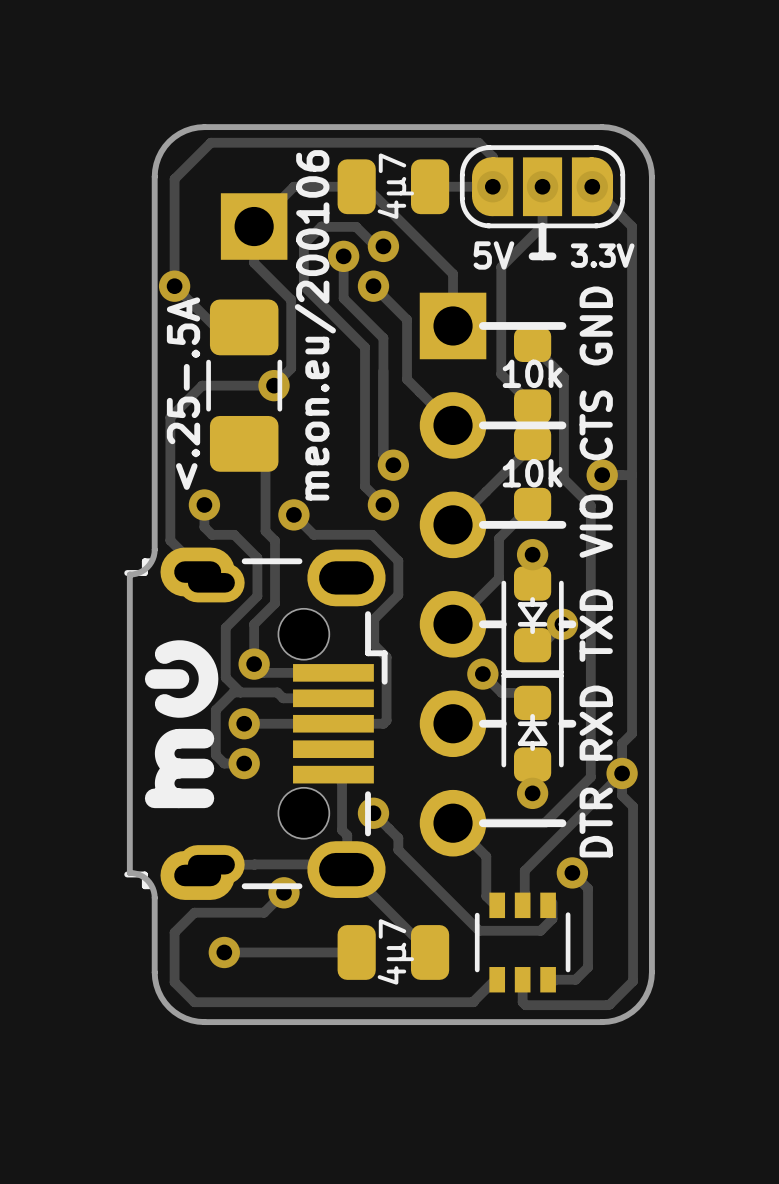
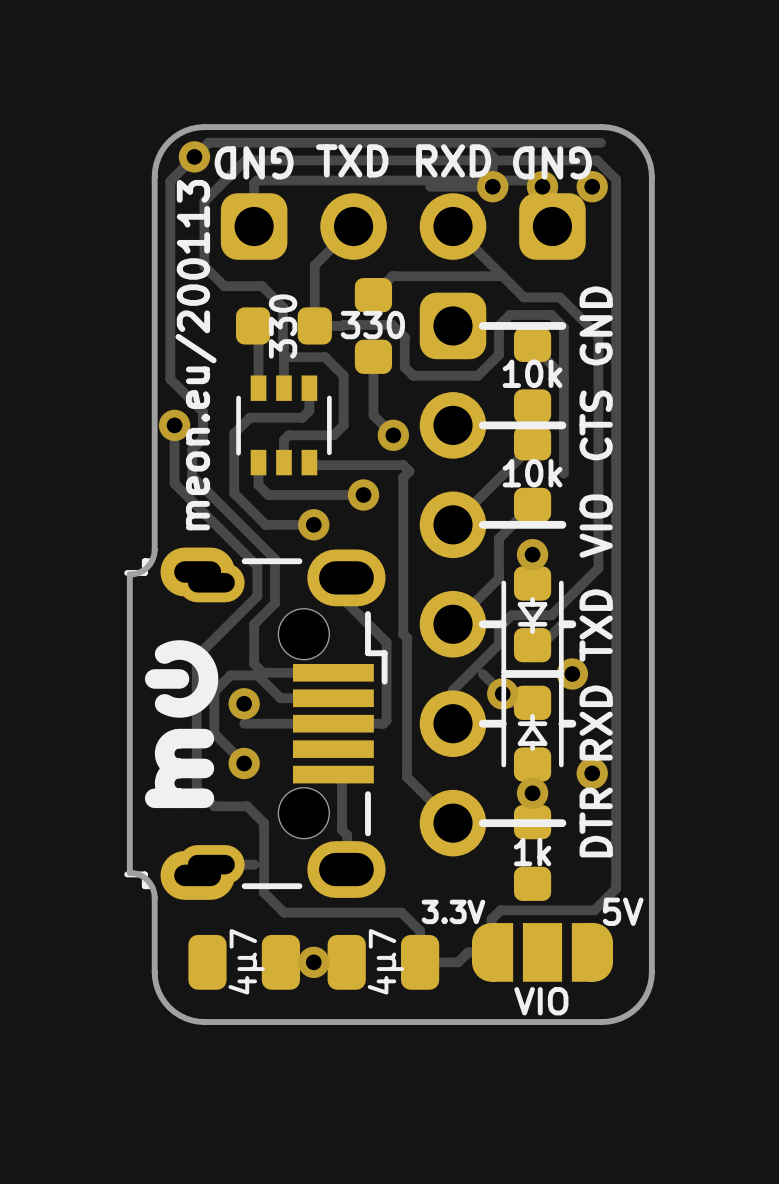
track: (478, 142) (210, 142) (174, 179) (174, 286) (215, 327) (244, 327) -> none
via: none -> (194, 156)
text: none -> TXD (352, 160)
text: none -> RXD (453, 160)
text: none -> GND (254, 162)
text: none -> GND (552, 162)
part position: (393, 186) -> (244, 962)
track: (542, 186) (542, 225) (501, 267) (501, 374) (532, 406) -> none
part: (542, 186) -> none
track: (592, 186) (632, 226) (632, 733) (622, 743) (622, 795) (633, 806) (633, 981) (609, 1004) (525, 1005) (522, 1002) (522, 979) -> none
track: none -> (254, 226) (254, 183) (257, 180) (549, 180) (552, 183) (552, 226)
part: (254, 226) -> none
track: (321, 226) (303, 244) (303, 286) (364, 347) (364, 486) (383, 504) -> none
track: (321, 226) (356, 226) (375, 246) (383, 246) -> none
part: none -> (403, 226)
track: none -> (453, 226) (523, 297) (559, 297) (598, 335) (598, 568) (551, 615) (511, 615) (499, 627) (499, 644) (453, 690) (453, 723)
line: (542, 226) (542, 256) -> none
track: none -> (373, 246) (353, 226) (314, 265) (314, 325) (392, 324) (404, 337) (404, 367) (413, 375) (478, 375) (499, 354) (499, 325) (509, 314) (551, 314) (563, 327) (563, 377)
via: (383, 246) -> none
text position: 5V (493, 255) -> 5V (623, 911)
text position: 3.3V (602, 255) -> 3.3V (453, 911)
track: (343, 256) (343, 298) (383, 338) (383, 455) (393, 465) -> none
via: (343, 256) -> none
line: (532, 256) (552, 256) -> none
track: none -> (502, 276) (392, 276) (373, 295)
via: (174, 286) -> none
track: (373, 286) (407, 319) (407, 379) (453, 425) -> none
via: (373, 286) -> none
part footprint: [419, 292, 487, 857] -> [419, 292, 487, 857]
track: none -> (254, 325) (258, 330) (258, 378)
part: none -> 330 (283, 325)
text: meon.eu/200106 (315, 325) -> none
part: none -> 330 (373, 325)
track: (453, 325) (453, 274) (365, 186) (293, 186) (254, 226) (254, 262) (291, 299) (291, 368) (274, 385) (202, 385) (170, 417) (170, 540) (197, 567) (197, 572) -> none
text: none -> meon.eu/200113 (196, 355)
track: none -> (283, 355) (325, 357) (343, 375) (343, 425) (333, 435) (288, 435) (283, 440) (283, 462)
track: none -> (373, 356) (373, 415) (393, 435)
track: none -> (283, 378) (282, 307) (262, 286) (224, 286) (204, 266) (204, 201) (245, 160) (597, 160) (616, 179) (616, 888) (594, 910) (500, 910) (491, 919) (491, 952) (468, 952) (458, 962) (423, 962)
part: (244, 385) -> none
via: (274, 385) -> none
track: none -> (309, 388) (309, 410) (302, 417) (249, 417) (234, 433) (234, 493) (265, 524) (313, 524)
text: <.25-.5A (183, 393) -> none
via: none -> (174, 425)
part: none -> (283, 425)
via: none -> (393, 435)
track: (244, 445) (265, 466) (265, 531) (275, 540) (275, 559) -> (601, 142) (208, 142) (170, 181) (170, 379) (202, 411) (202, 439) (192, 449) (192, 476) (275, 559)
track: none -> (258, 462) (258, 485) (268, 494) (363, 494)
via: (393, 465) -> none
track: (563, 473) (563, 478) (590, 505) (590, 777) (544, 823) (453, 823) -> (313, 465) (403, 465) (409, 471) (403, 477) (403, 634) (407, 637) (407, 777) (453, 823)
via: (602, 475) -> none
via: none -> (363, 494)
track: (204, 504) (204, 527) (212, 534) (234, 534) (257, 557) (257, 566) -> (174, 425) (174, 483) (257, 566)
via: (204, 504) -> none
via: (383, 504) -> none
track: (293, 514) (313, 534) (372, 534) (398, 560) (398, 594) (374, 619) (374, 644) (386, 657) -> (343, 584) (343, 599) (386, 642) (386, 657)
via position: (293, 514) -> (313, 524)
via: (562, 624) -> none
track: (225, 627) (225, 677) (240, 692) -> (225, 627) (196, 656) (196, 788) (214, 806) (247, 806) (264, 823) (264, 892) (283, 912) (401, 912) (420, 931) (420, 962)
via: (254, 664) -> none
via position: (482, 674) -> (502, 693)
via: none -> (572, 673)
track: (283, 698) (277, 692) (233, 692) (215, 710) (215, 755) (224, 763) (244, 763) -> (283, 698) (280, 698) (257, 675) (230, 675) (214, 691) (214, 733) (244, 763)
via position: (244, 723) -> (244, 703)
track: (622, 773) (524, 870) (524, 902) -> none
via position: (622, 773) -> (592, 773)
track: (373, 813) (398, 838) (398, 849) (479, 930) (540, 930) (552, 918) (552, 902) -> none
via: (373, 813) -> none
track: (453, 823) (486, 856) (486, 896) (492, 902) -> none
part: none -> 1k (532, 852)
track: (254, 864) (335, 864) (343, 872) (350, 872) (430, 952) -> none
track: (572, 872) (588, 888) (588, 967) (575, 979) (555, 979) (552, 982) -> none
via: (572, 872) -> none
track: (283, 892) (264, 912) (194, 912) (174, 932) (174, 982) (194, 1002) (473, 1002) -> none
via: (283, 892) -> none
part footprint: [474, 892, 571, 993] -> [472, 923, 613, 982]
track: (224, 952) (356, 952) -> none
via: (224, 952) -> none
part position: (393, 952) -> (383, 962)
via: none -> (313, 962)
track: (492, 982) (473, 1001) -> none
text: none -> VIO (541, 1001)

